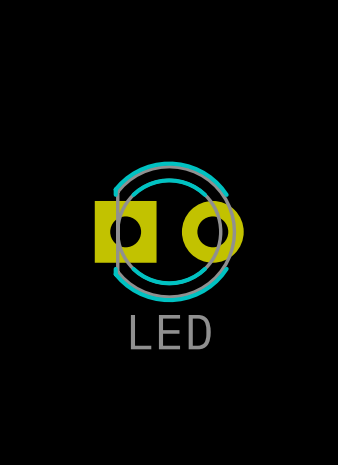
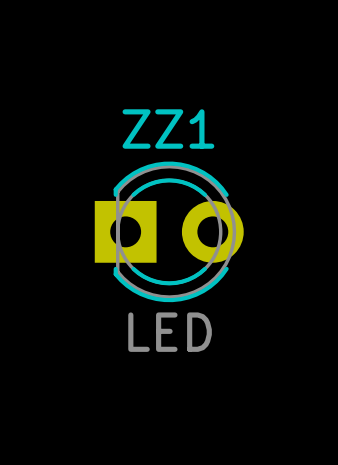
ZZ1 name: none -> ZZ1 (168, 129)

